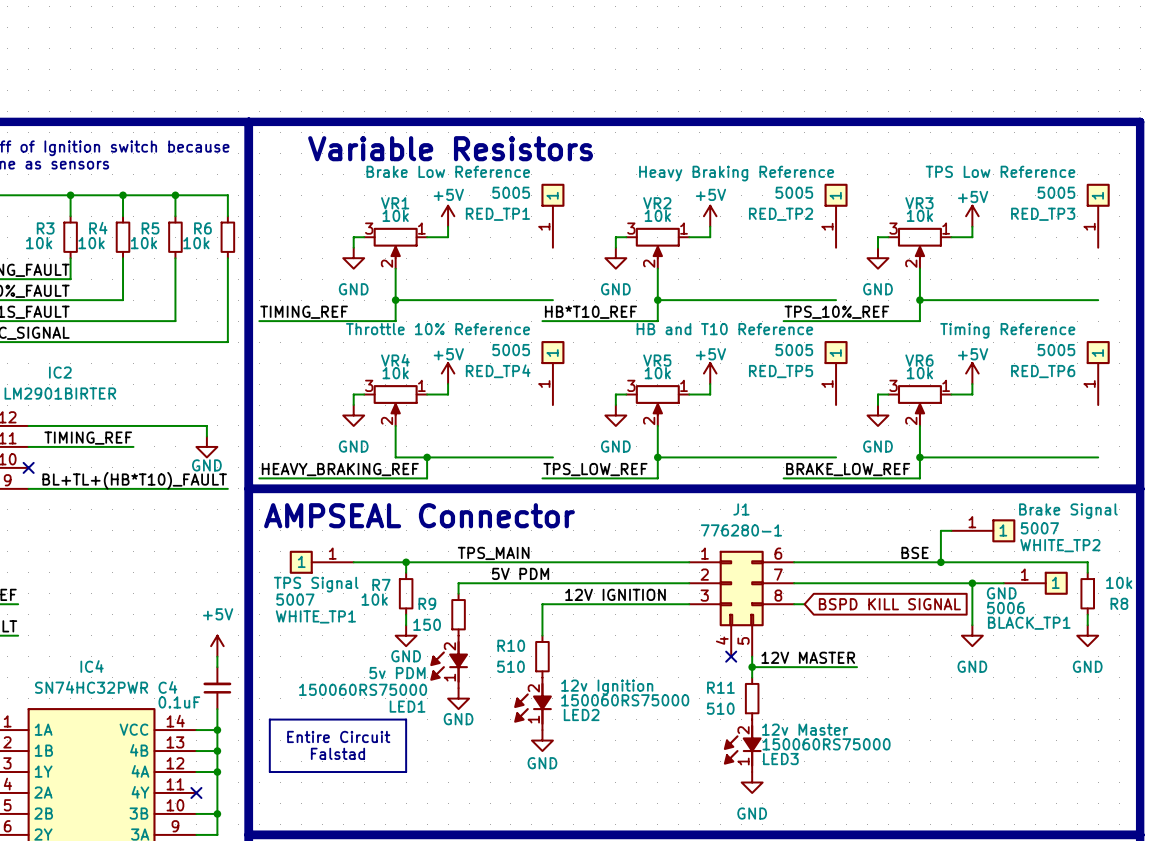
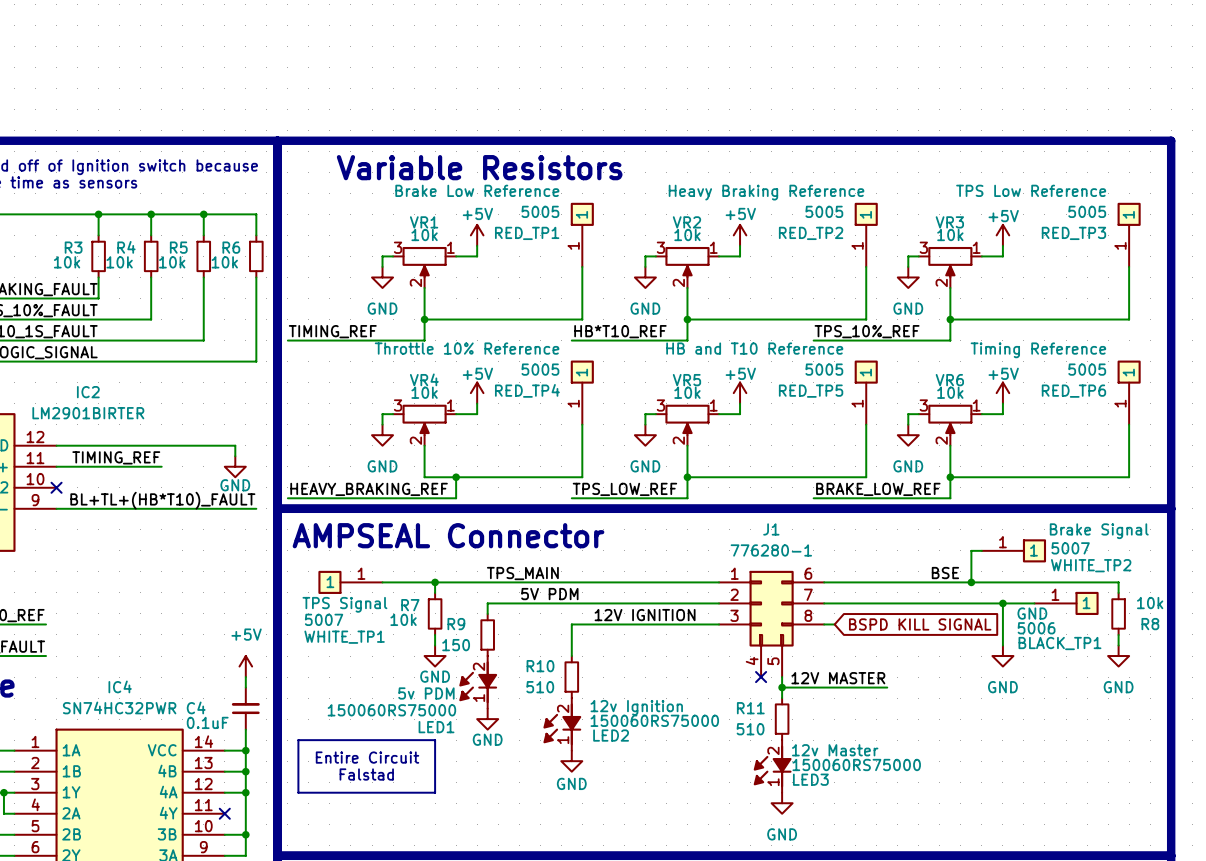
wire: none -> (582, 266) (582, 319)
wire: none -> (866, 266) (866, 319)
wire: none -> (1129, 266) (1129, 319)
wire: none -> (582, 424) (582, 477)
wire: none -> (866, 424) (866, 477)
wire: none -> (1129, 424) (1129, 477)

